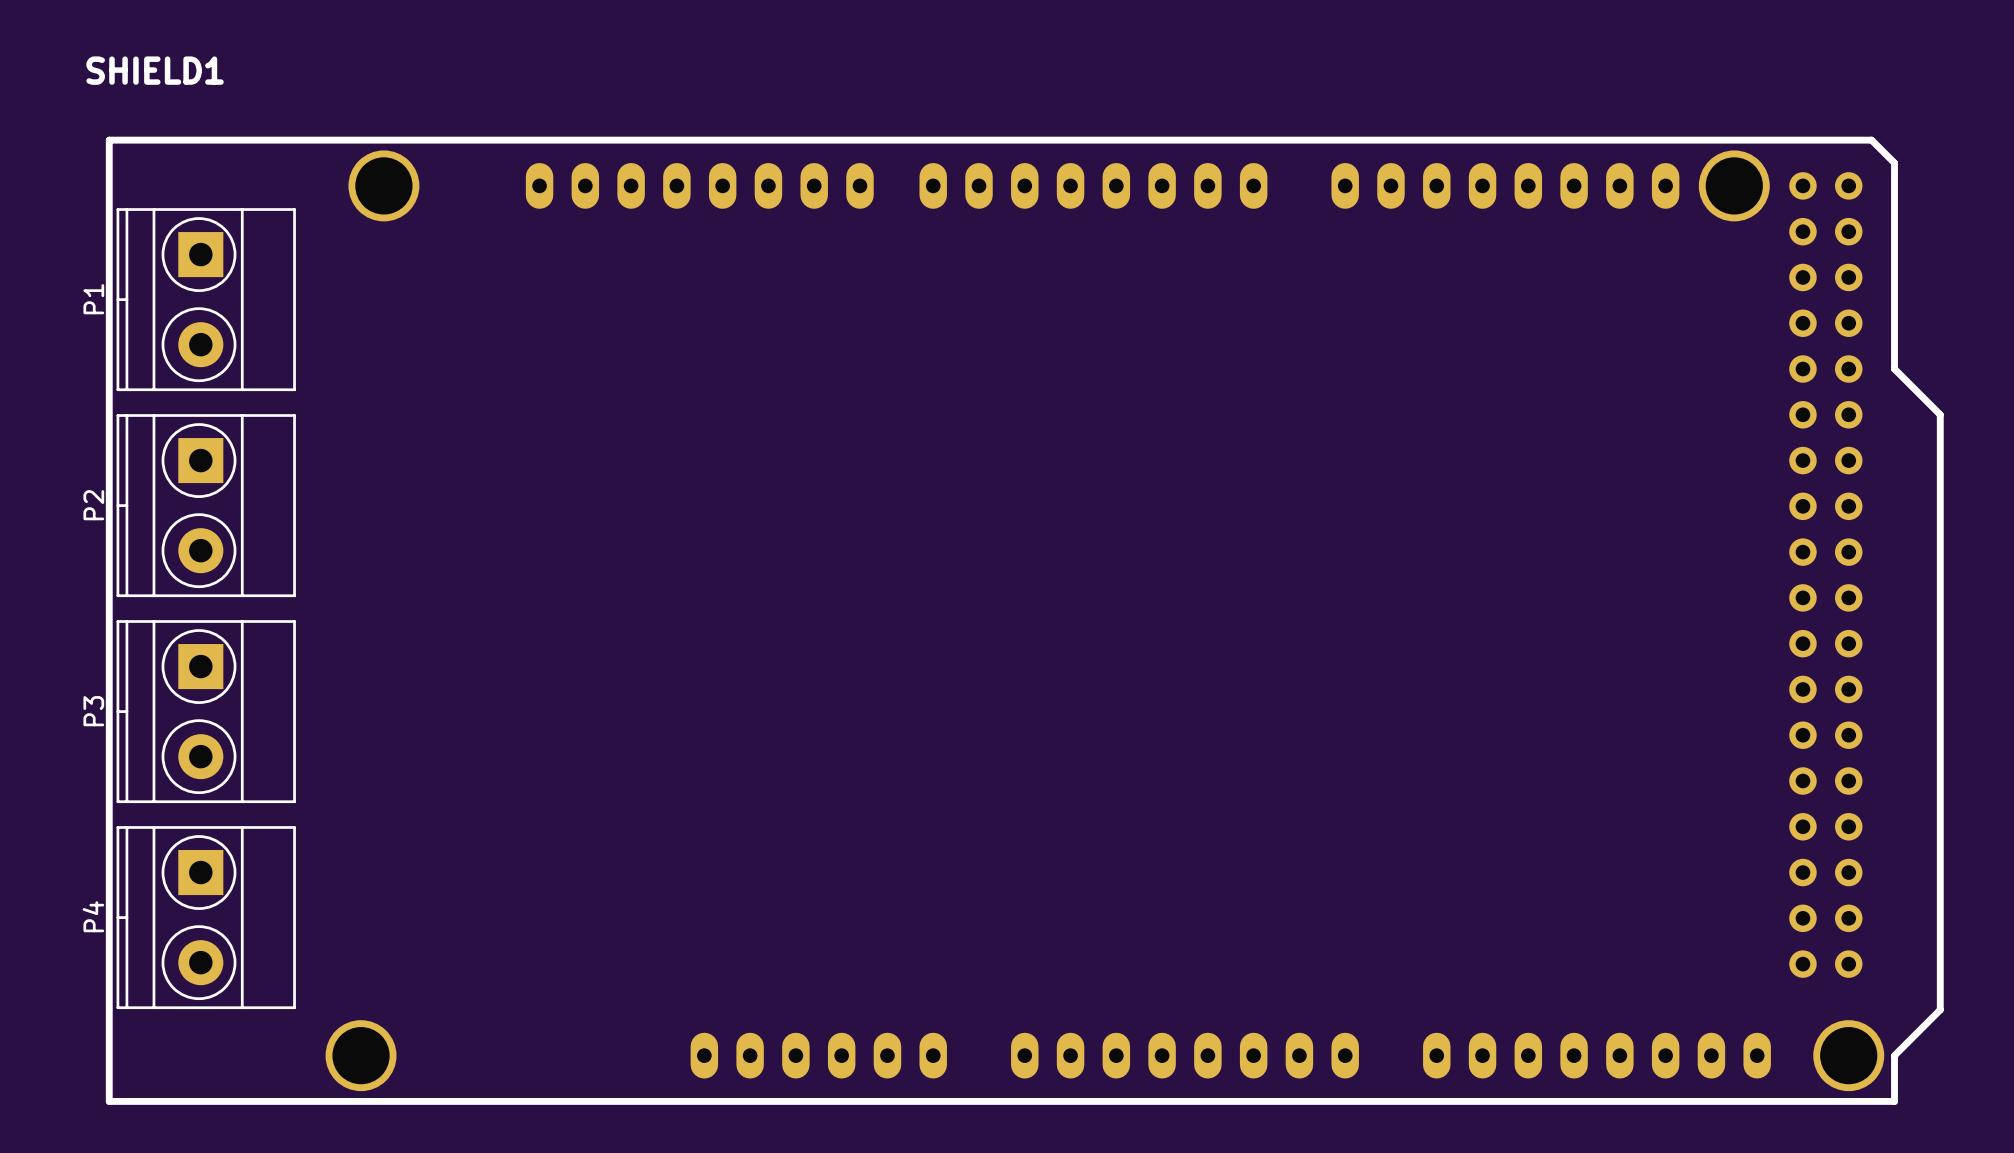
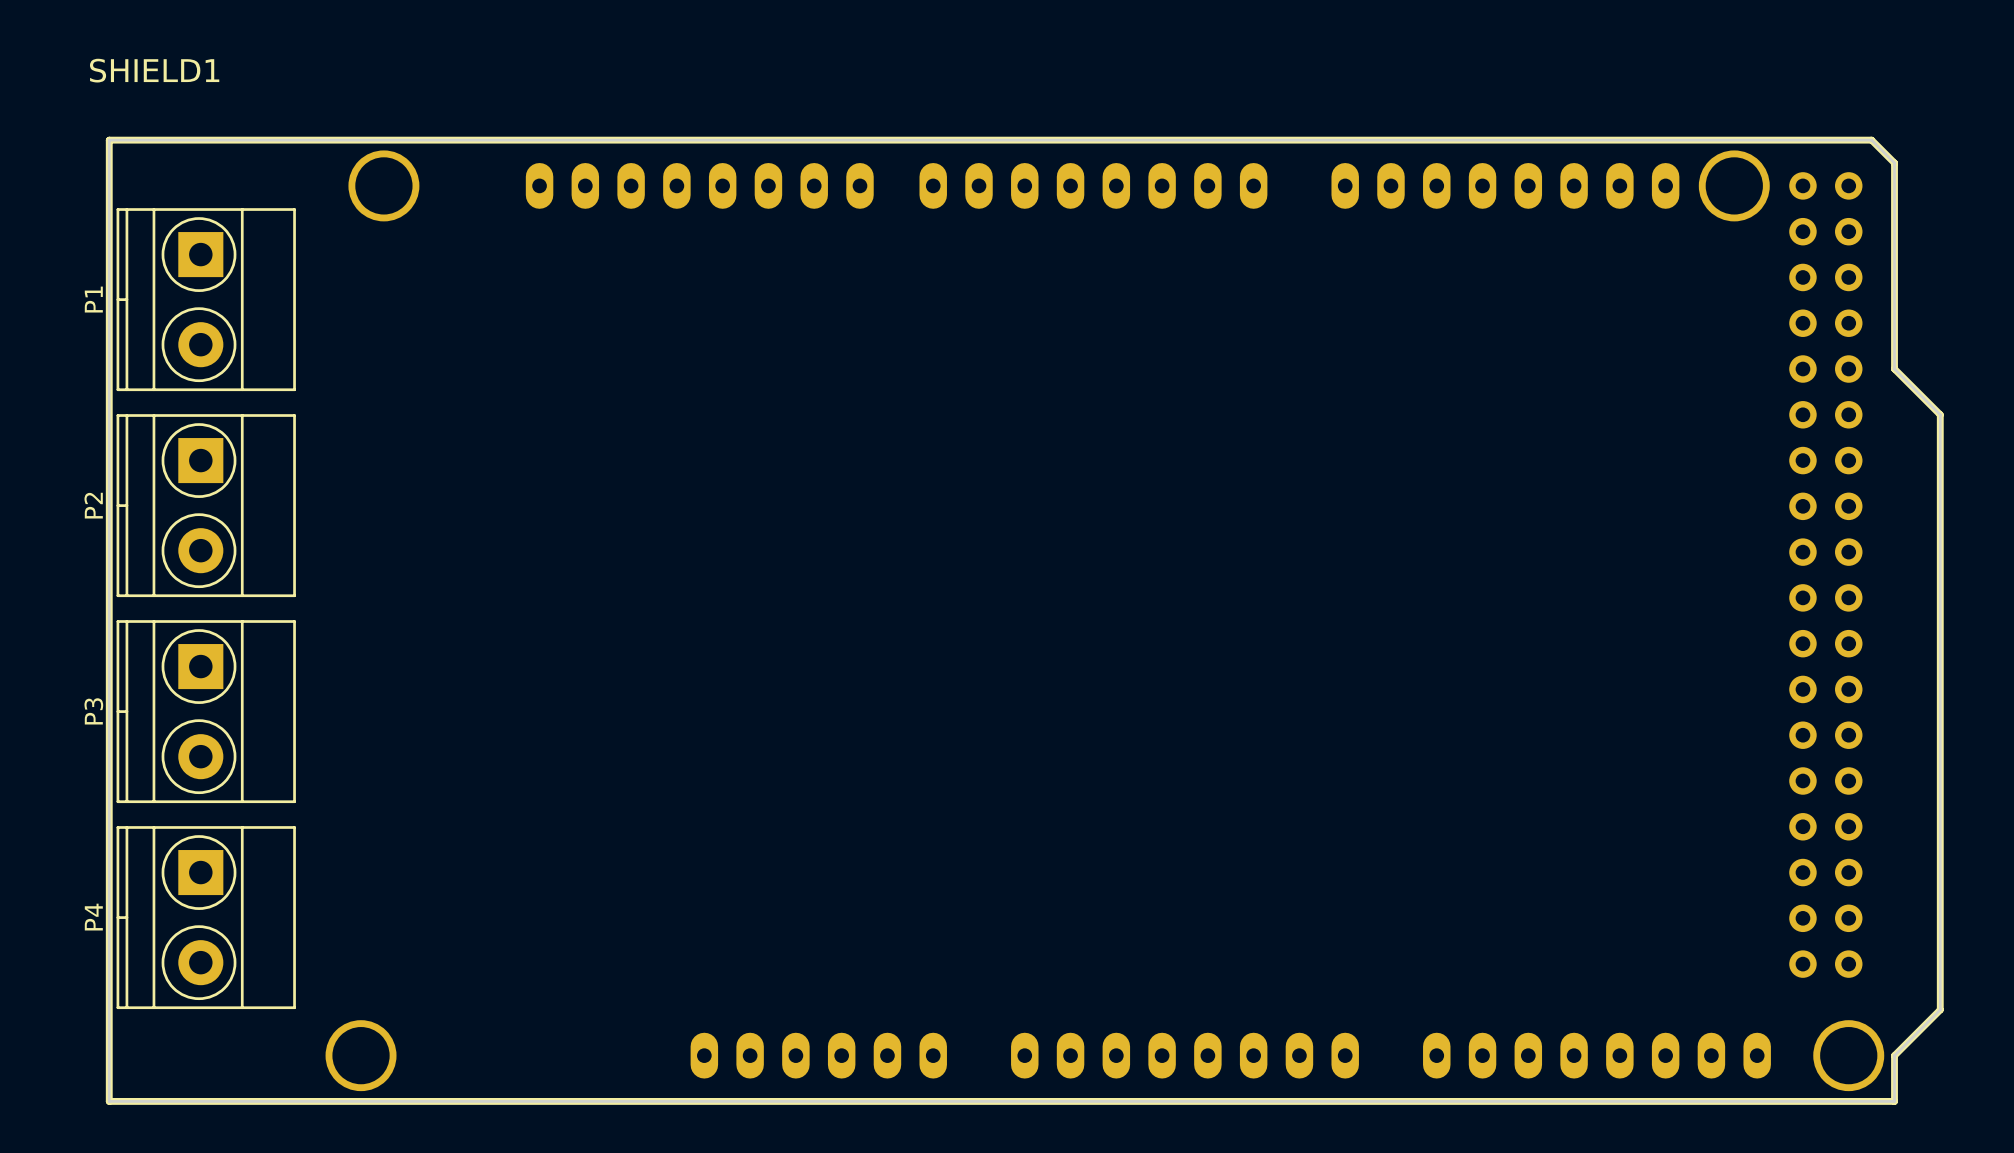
board edge: none -> (109, 140) (109, 1101) (1894, 1101) (1894, 1055) (1940, 1009) (1940, 414) (1894, 369) (1894, 163) (1871, 140) (109, 140)

